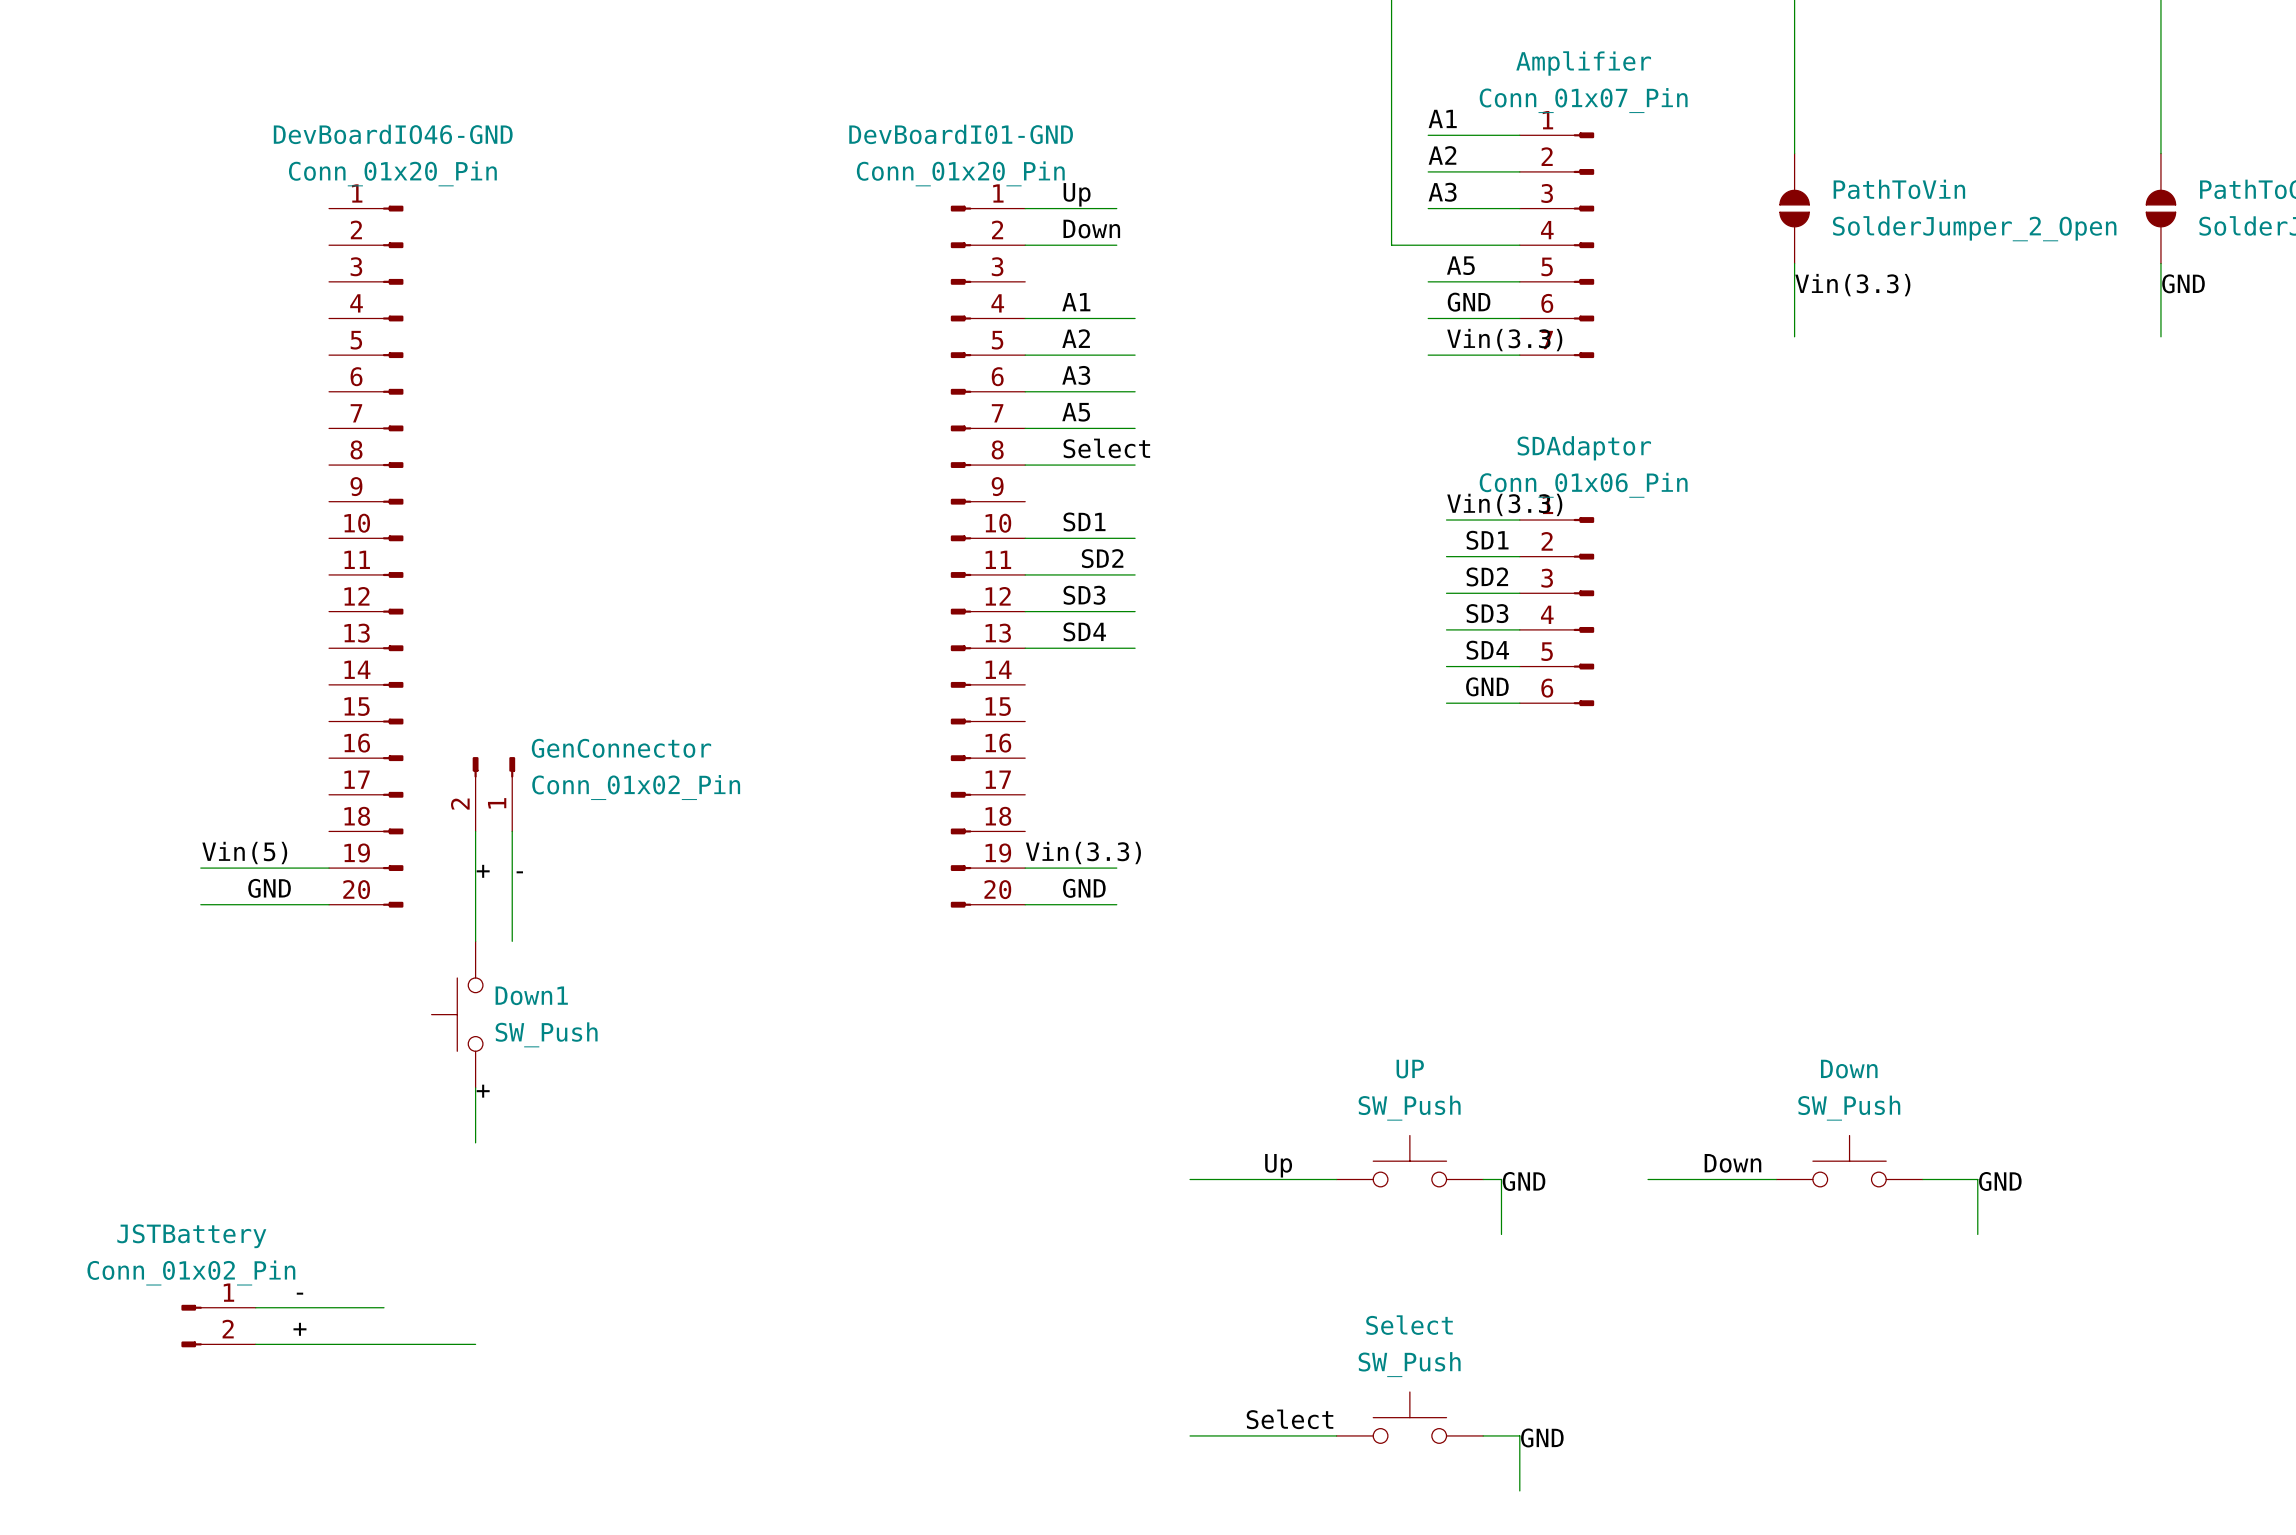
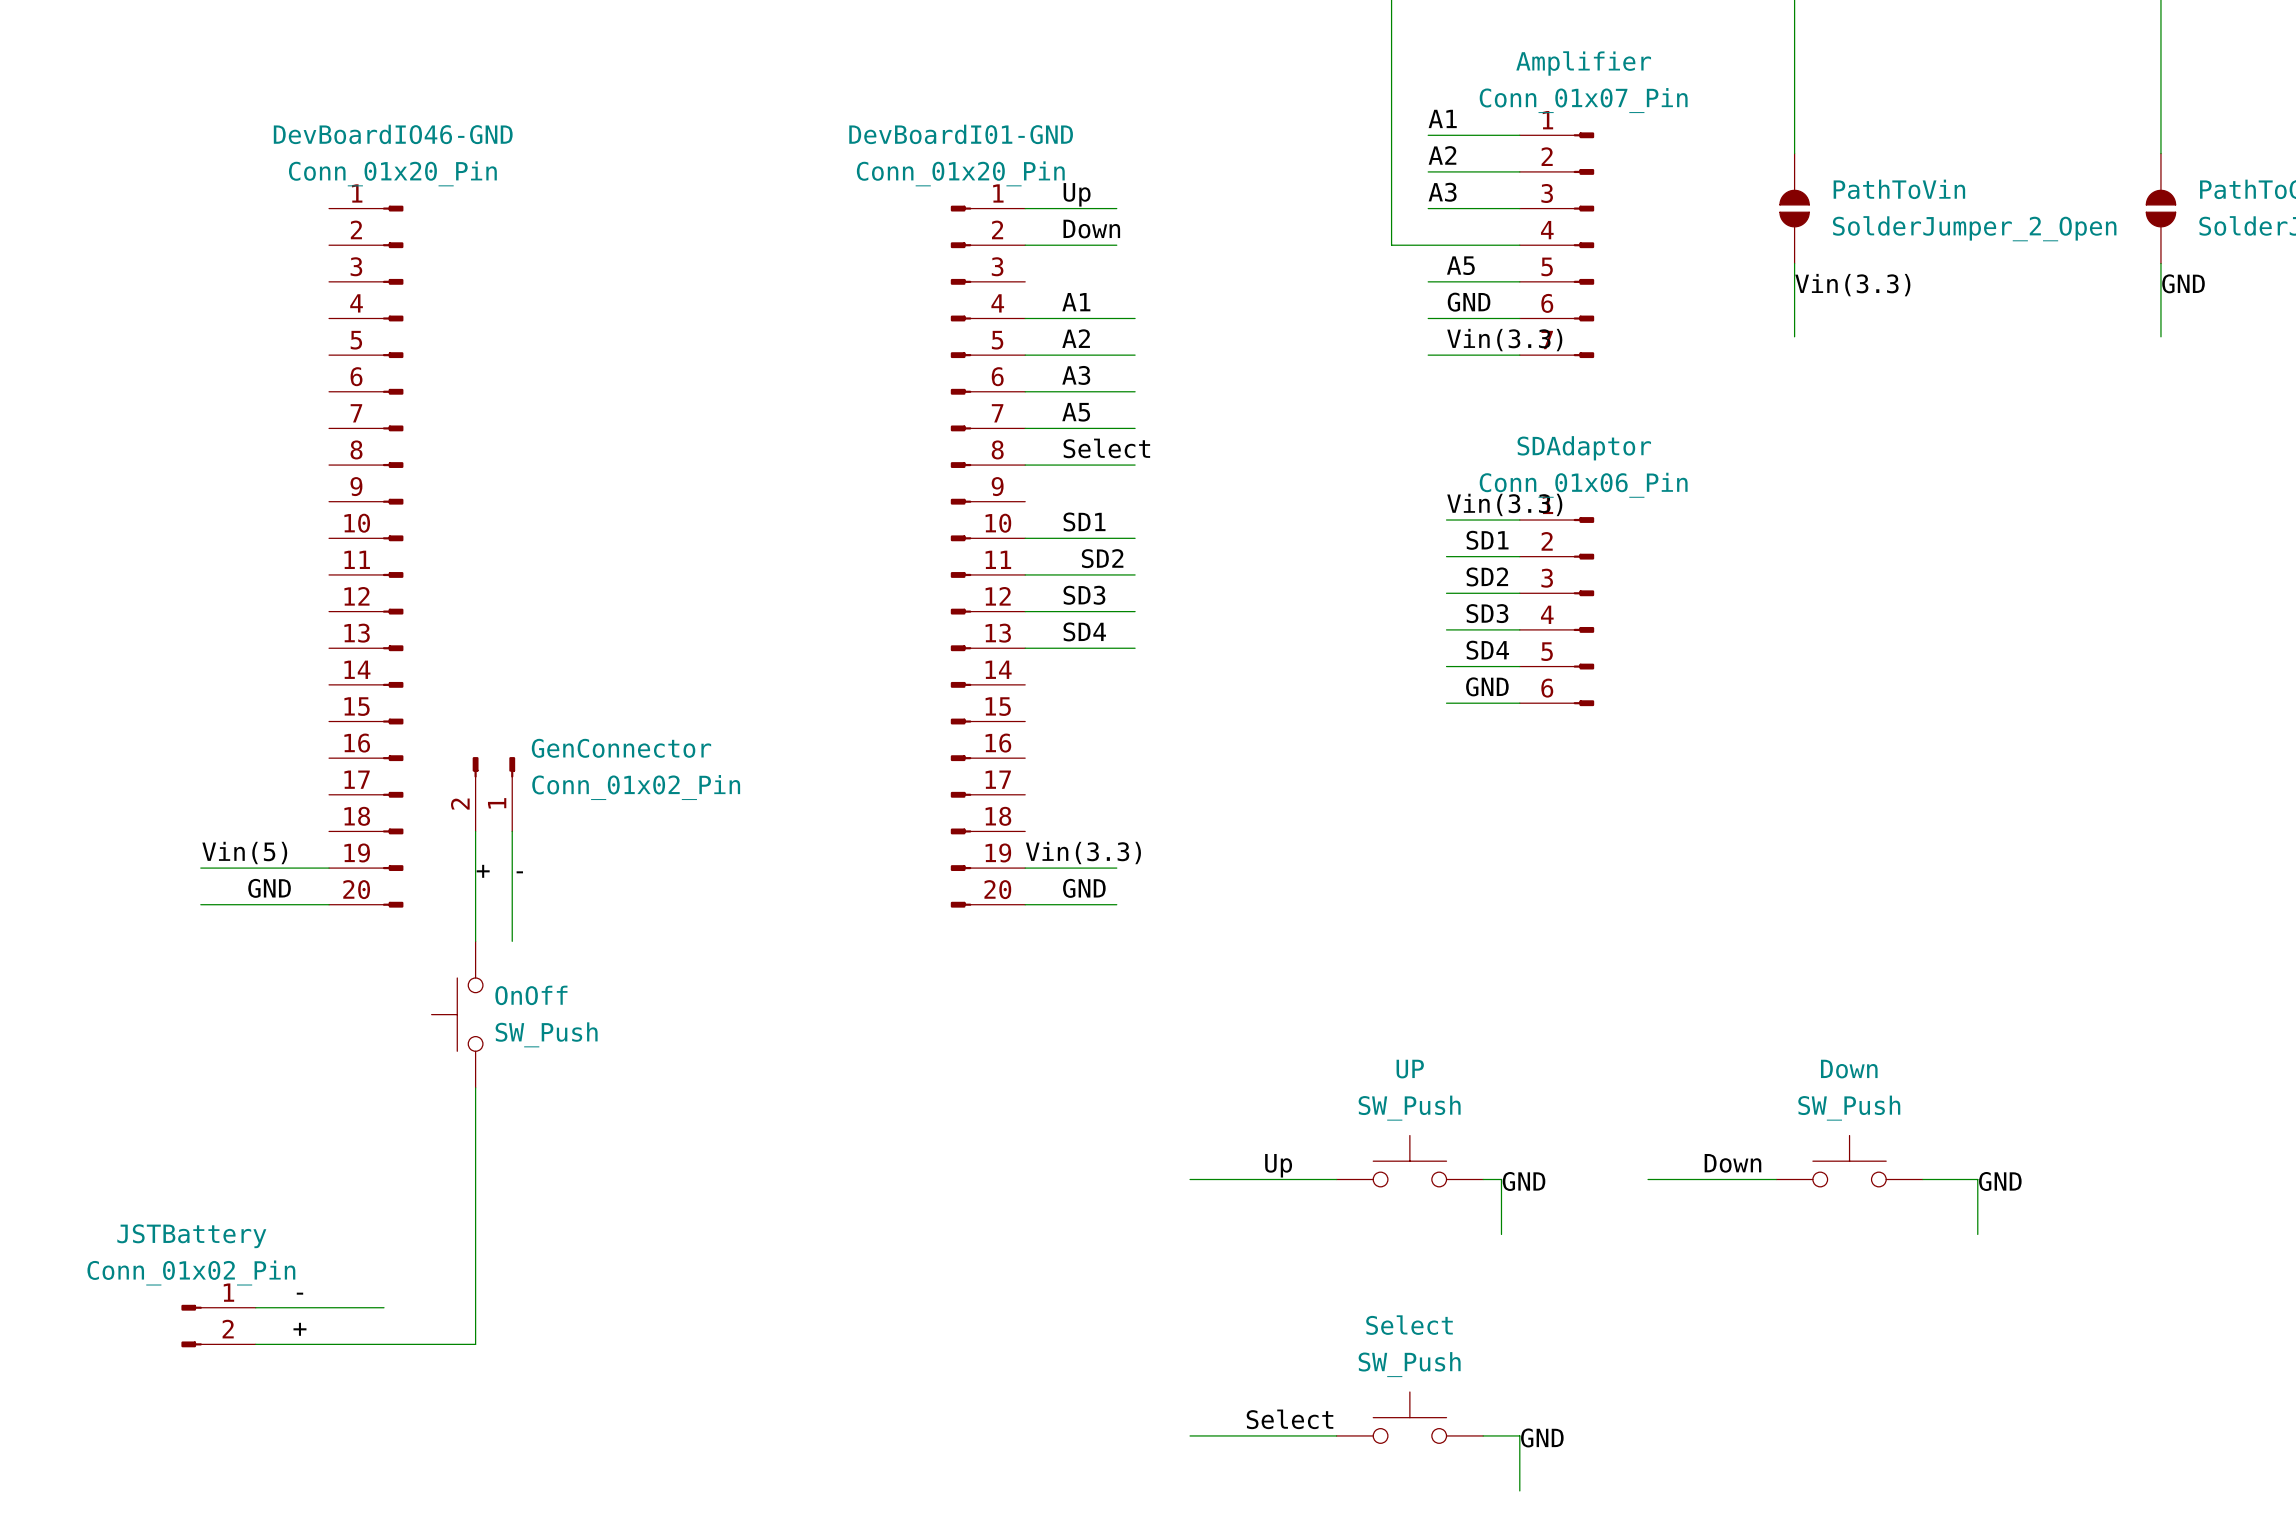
Down1 name: Down1 (531, 995) -> OnOff (531, 995)
label: + (483, 1091) -> none
wire: none -> (475, 1142) (475, 1344)

